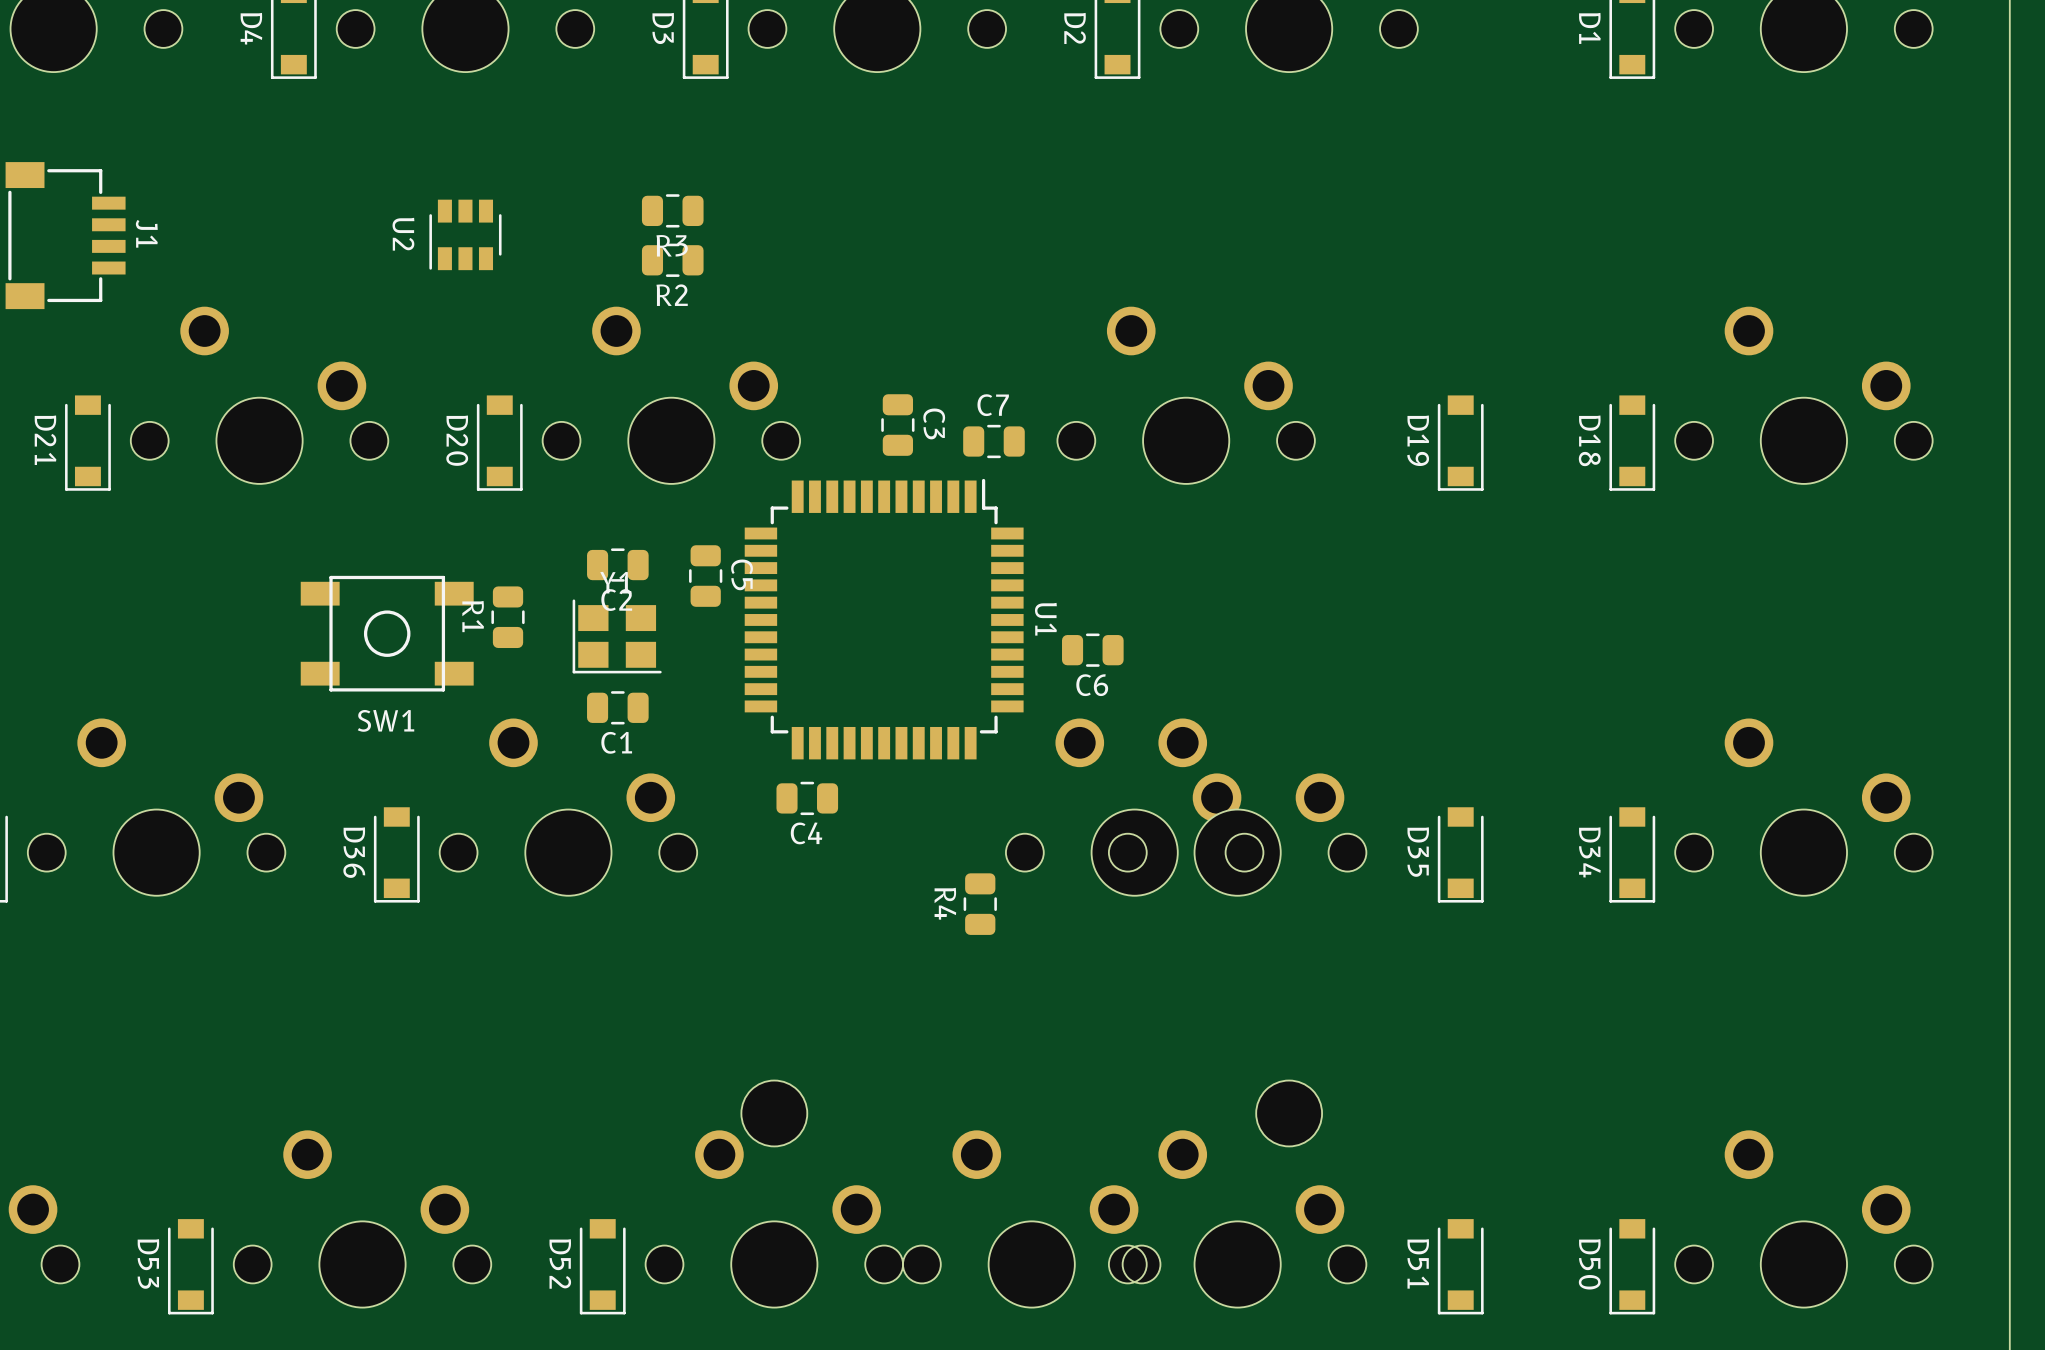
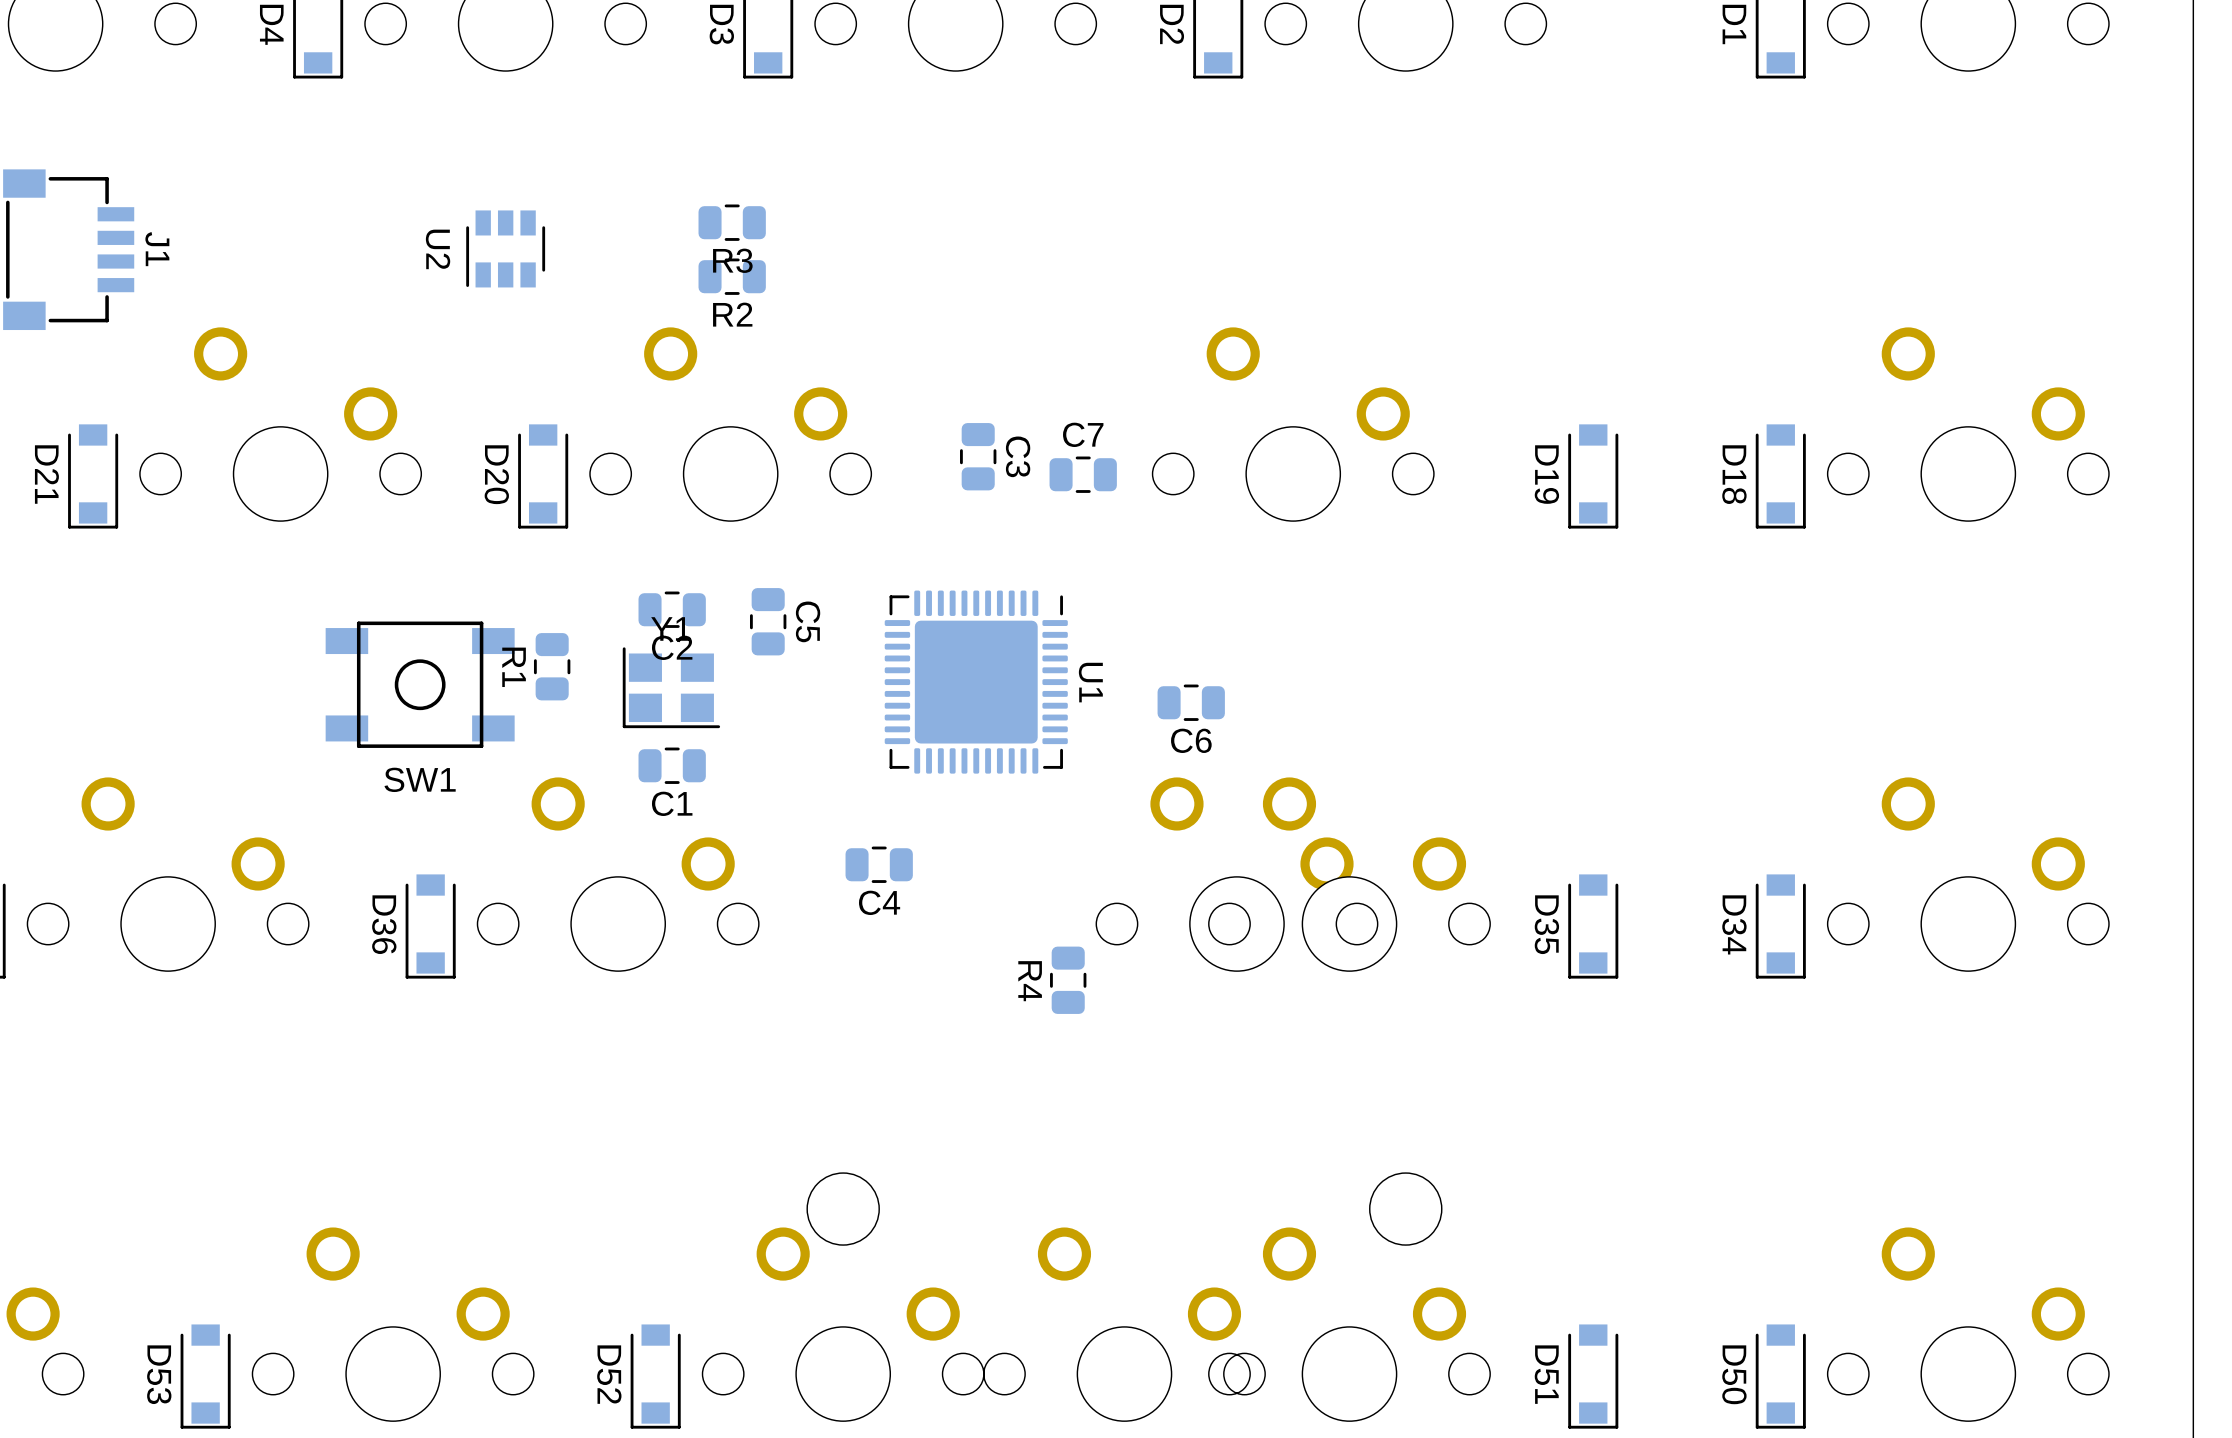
U1 footprint: [744, 478, 1024, 760] -> [884, 590, 1068, 774]
U1 name position: U1 (1045, 619) -> U1 (1090, 682)

